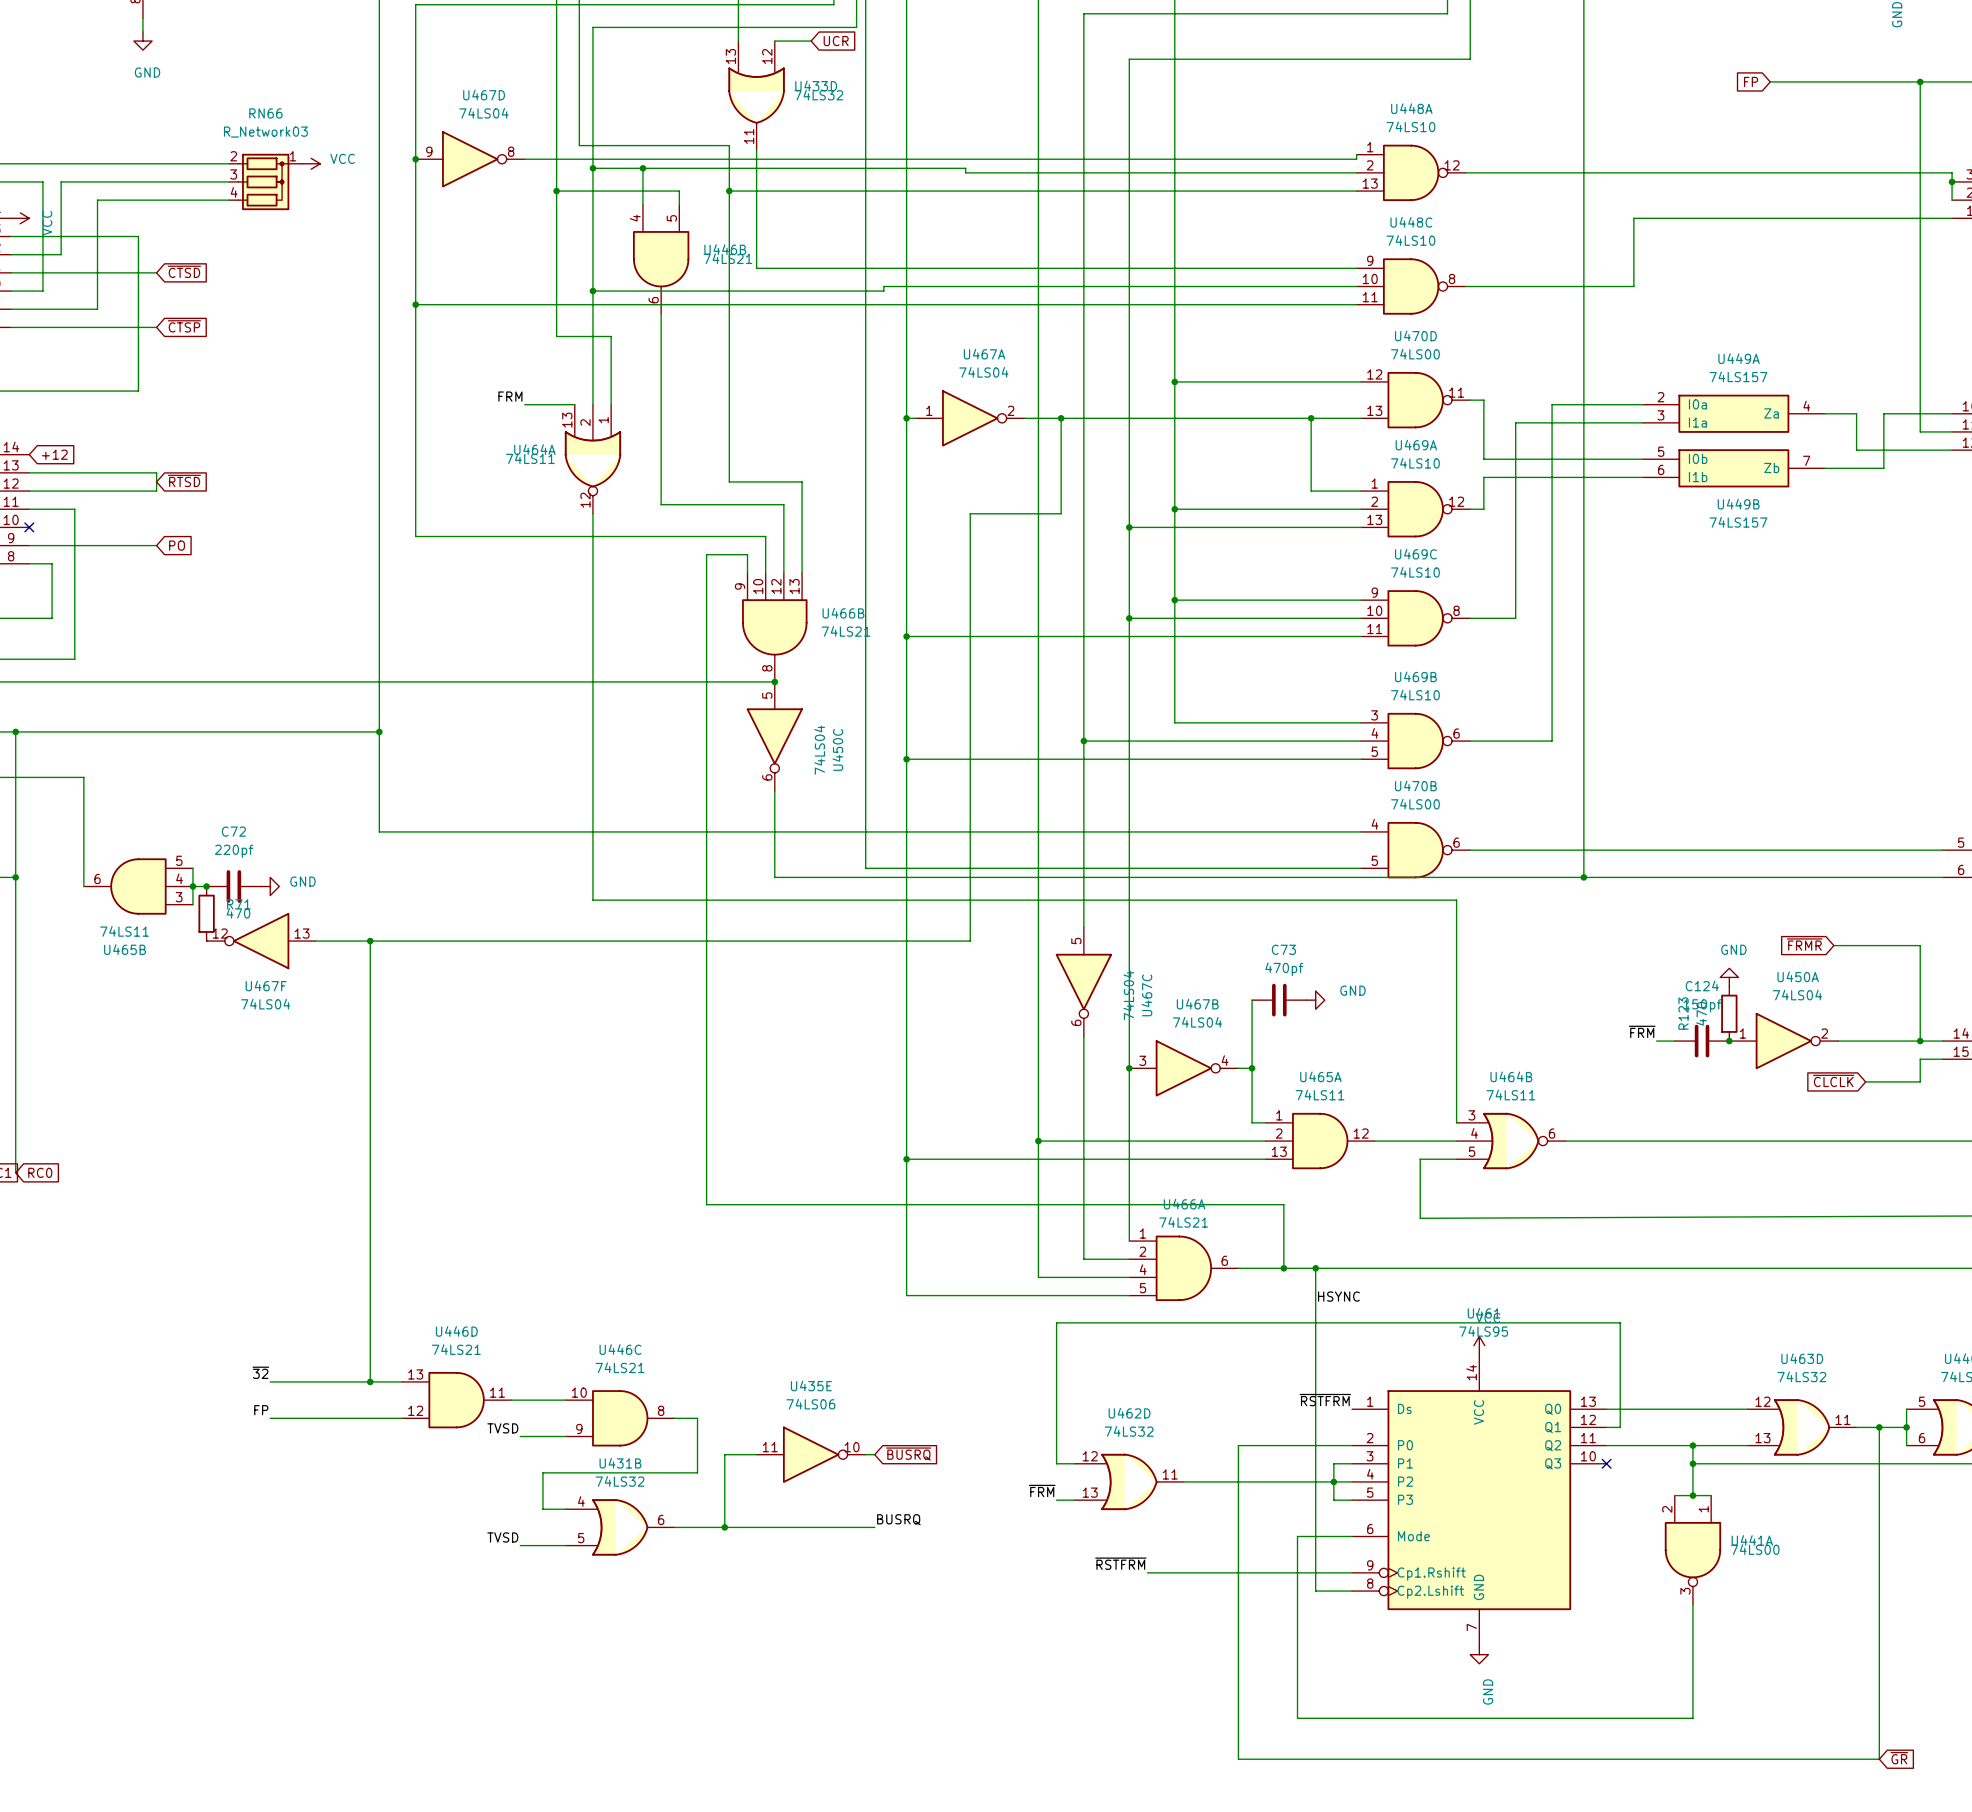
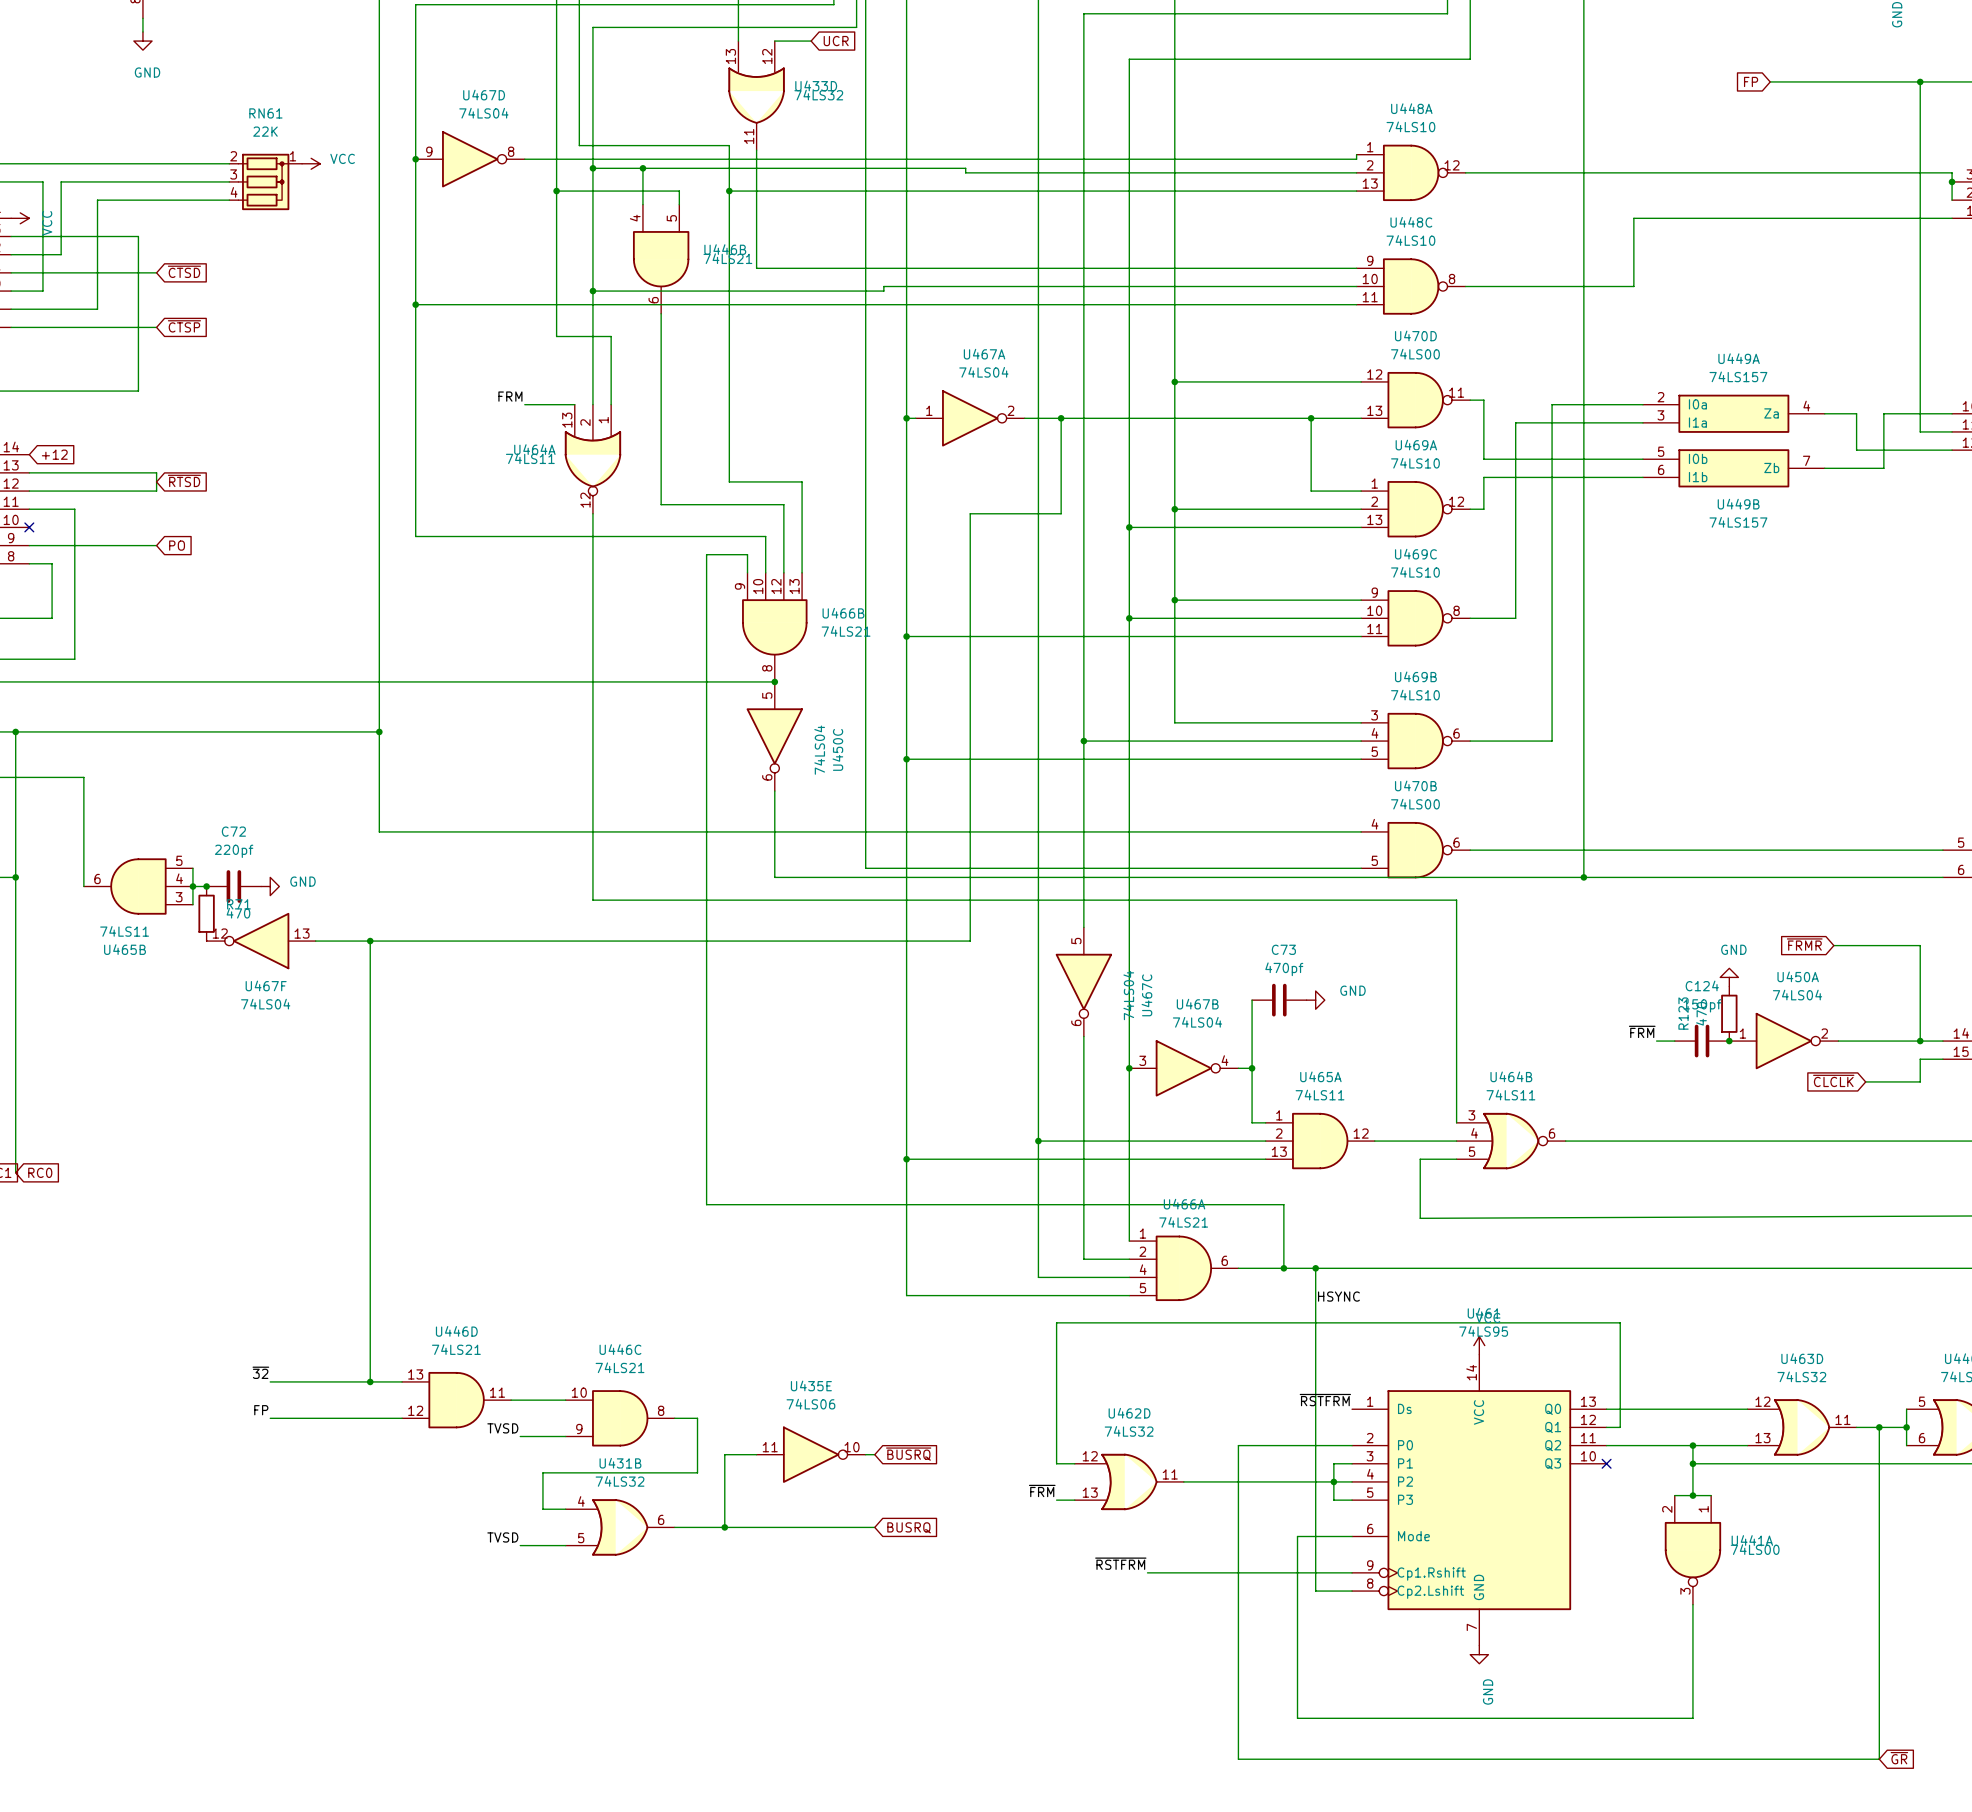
RN66 name: RN66 (265, 113) -> RN61 (265, 113)
RN66 value: R_Network03 (265, 132) -> 22K (265, 131)
label: BUSRQ (898, 1519) -> none
global label: none -> BUSRQ (909, 1527)

